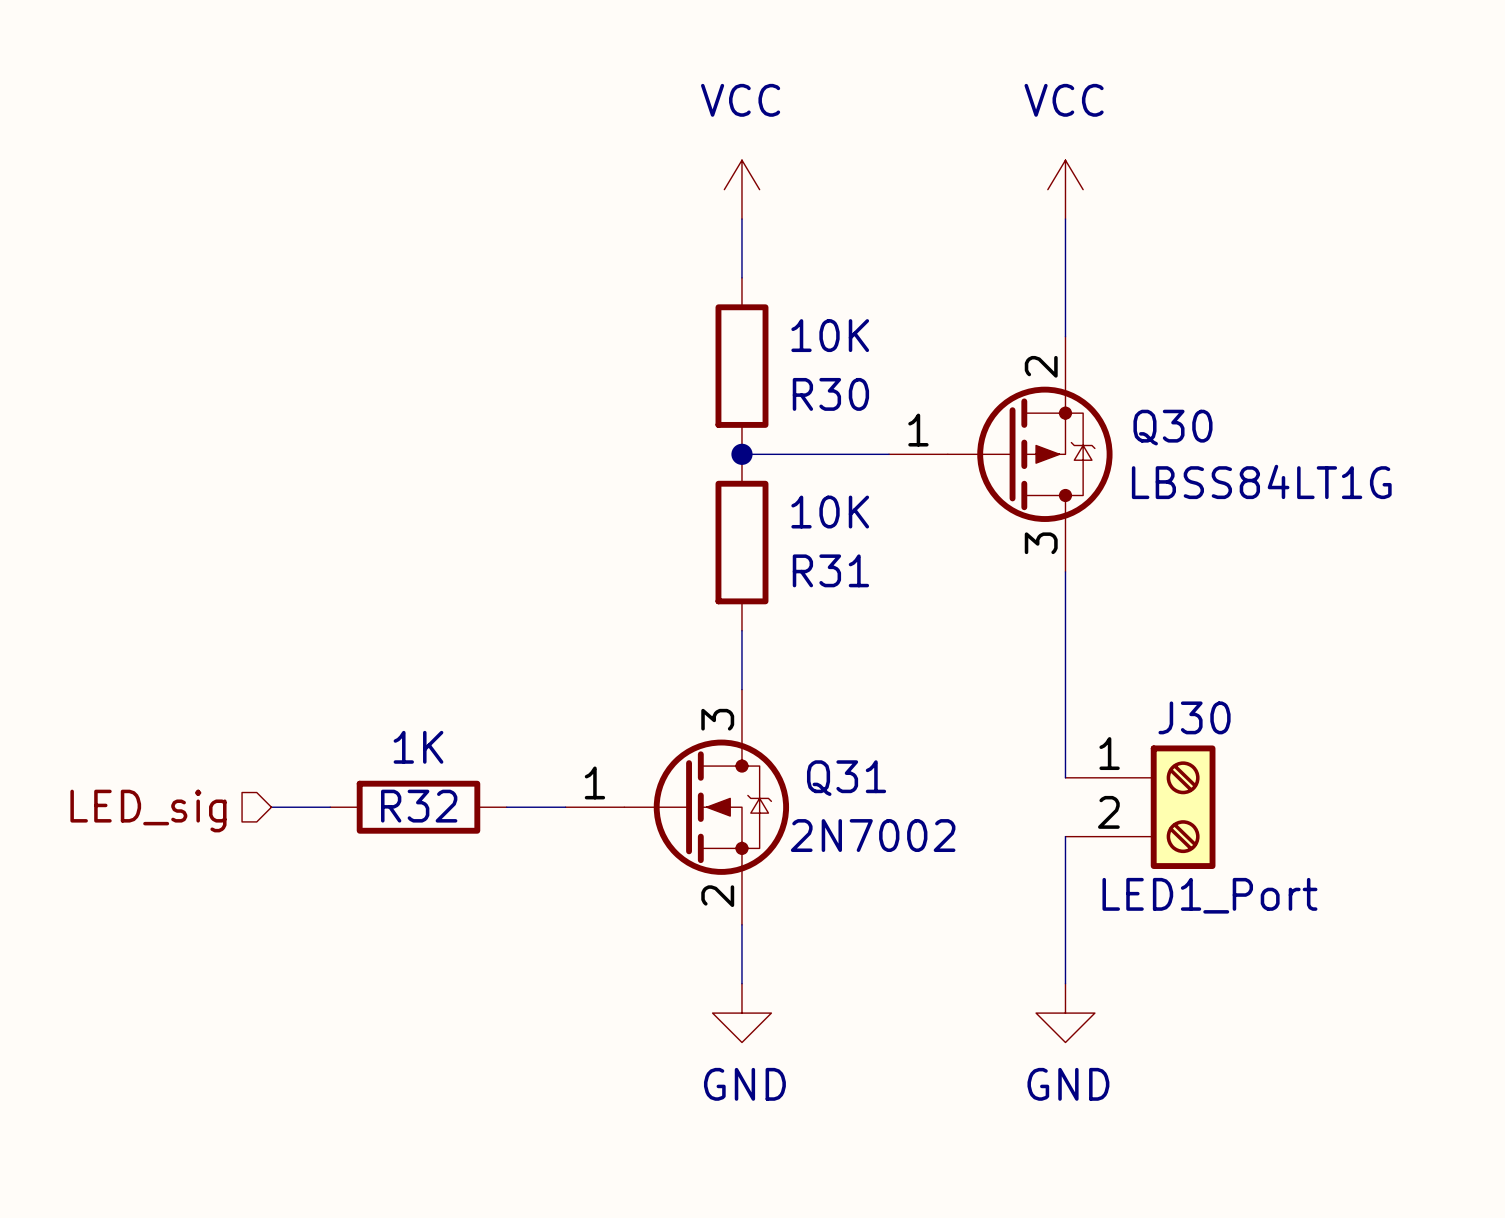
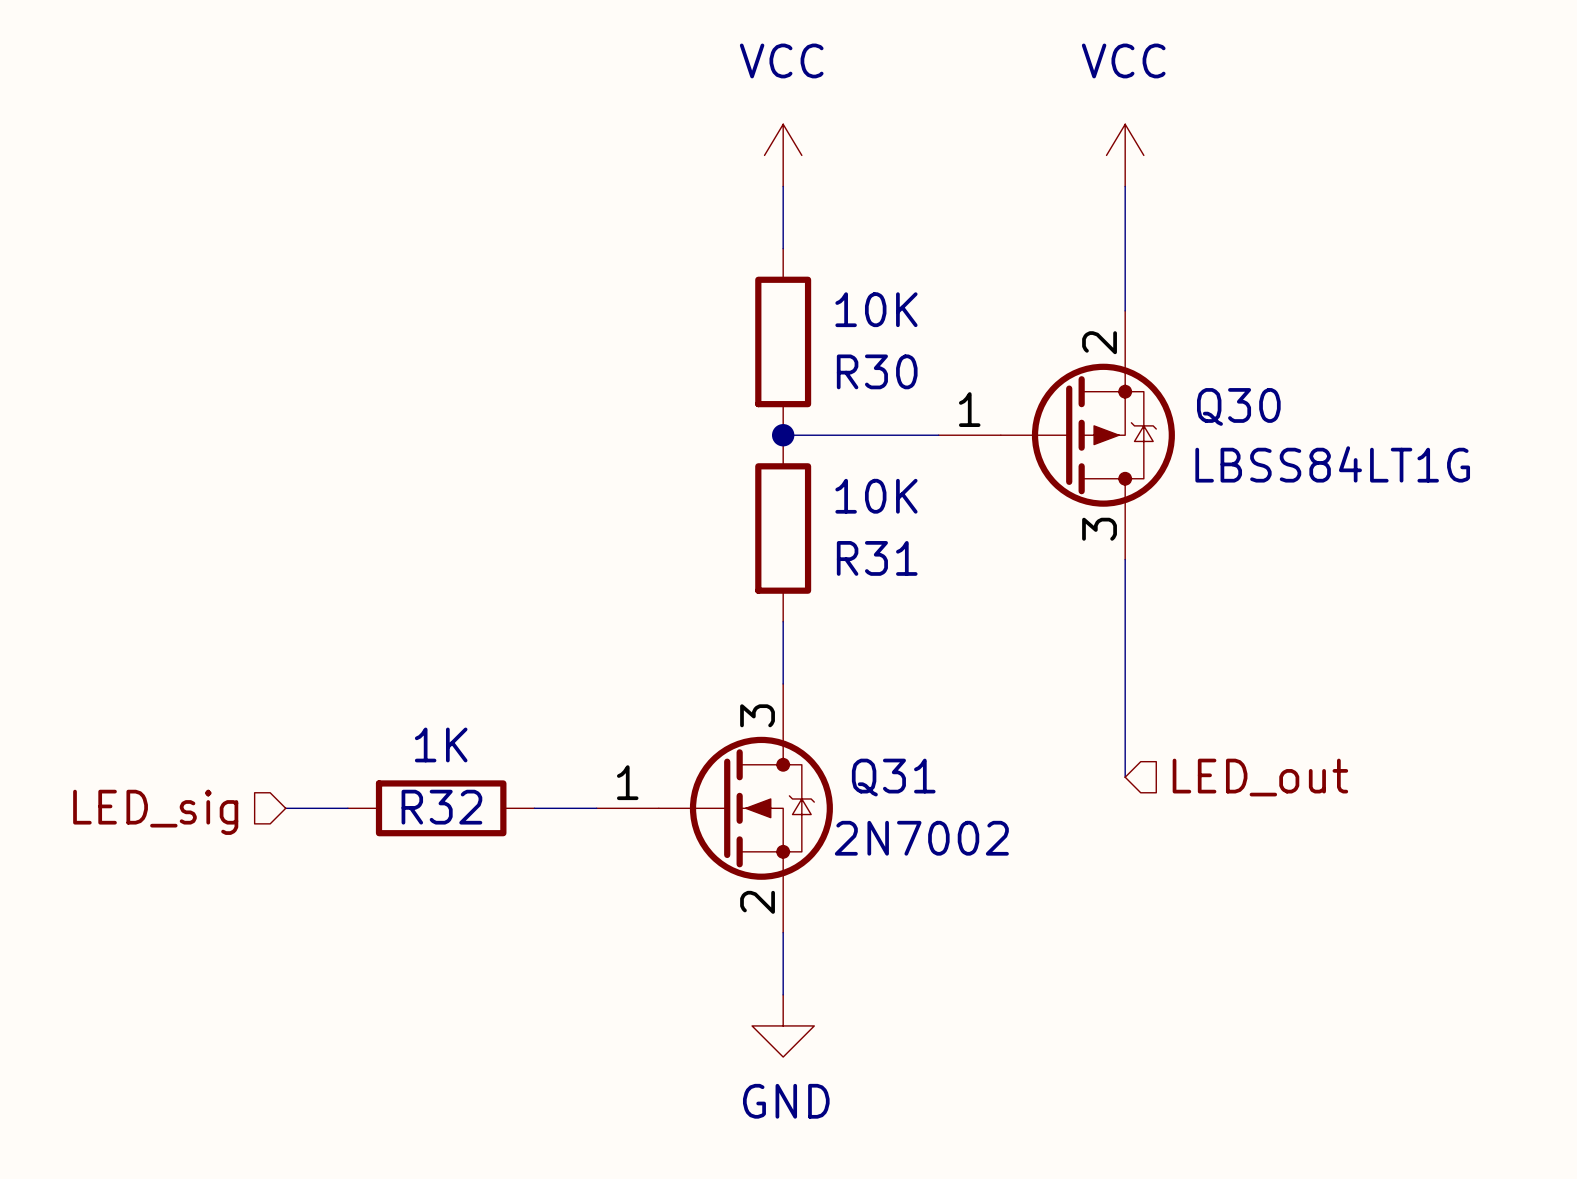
hierarchical label: none -> LED_out (1260, 777)
J30: LED1_Port (1140, 807) -> none
wire: (1065, 836) (1065, 983) -> none
power symbol: GND (1065, 1013) -> none

